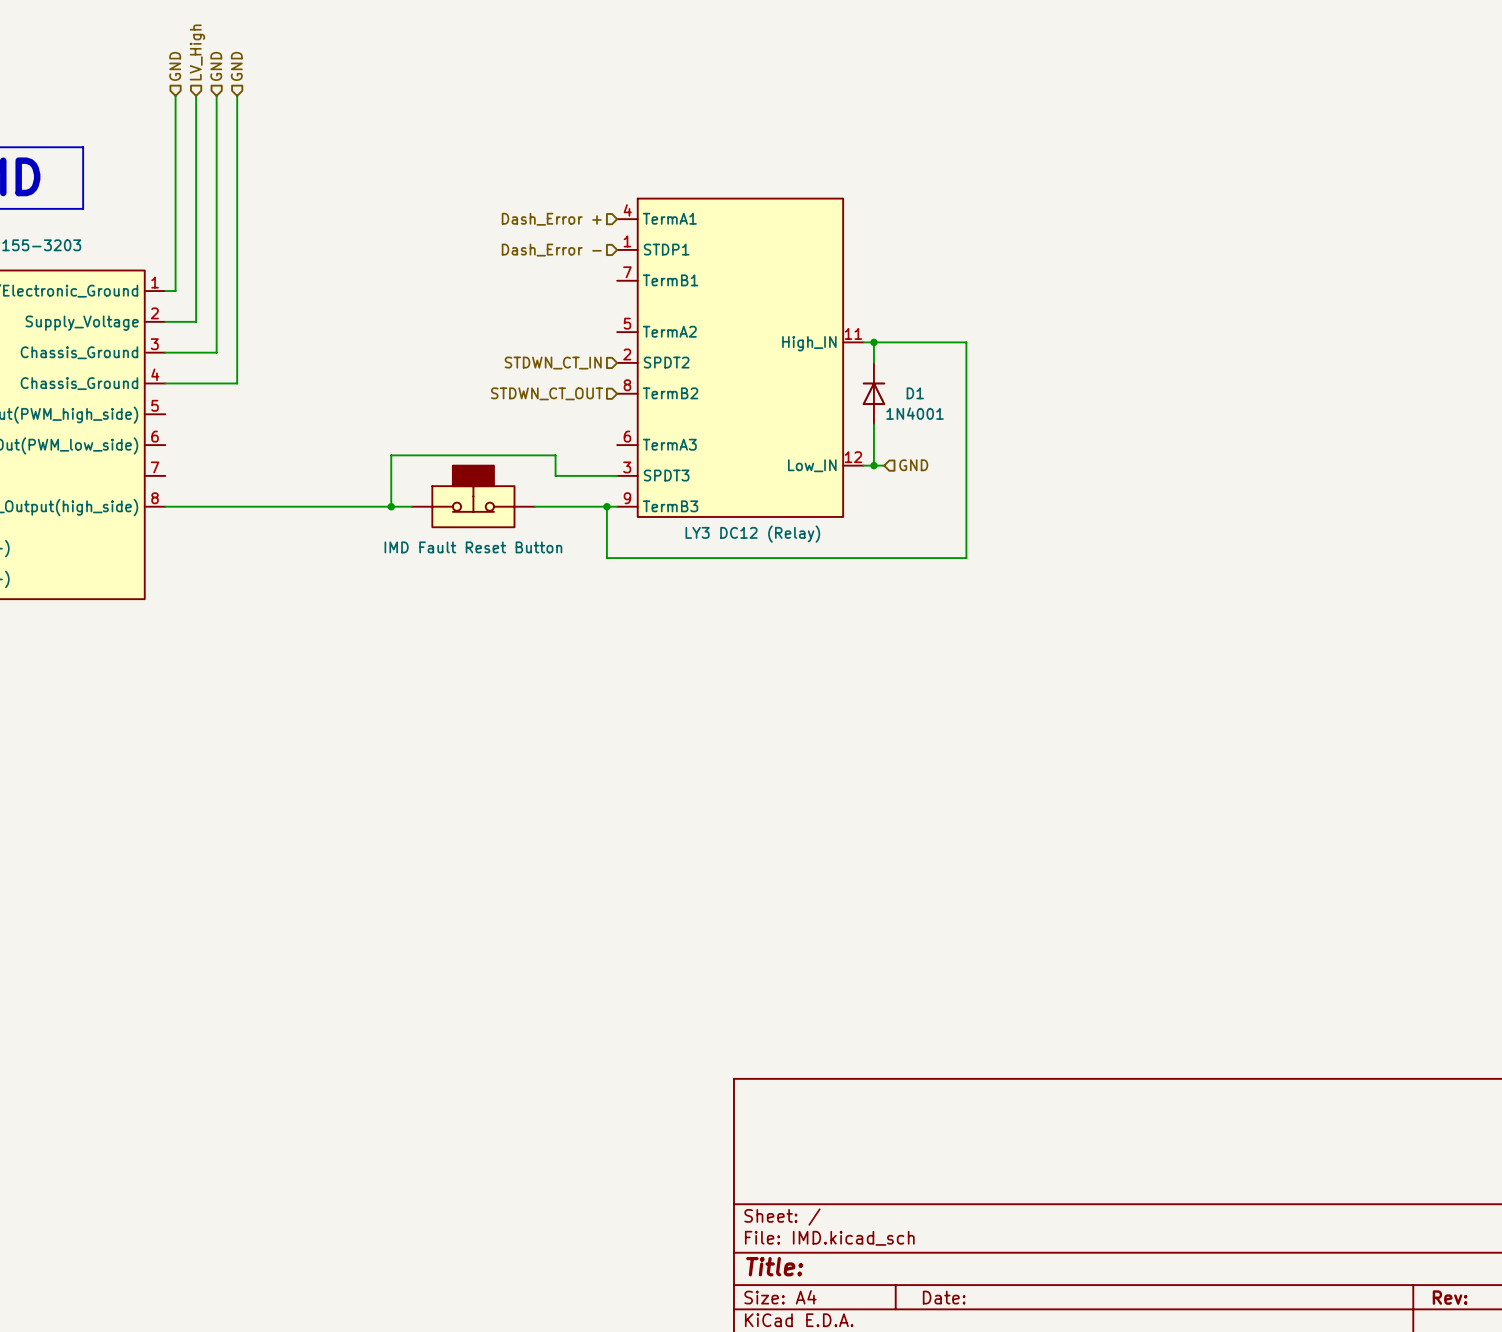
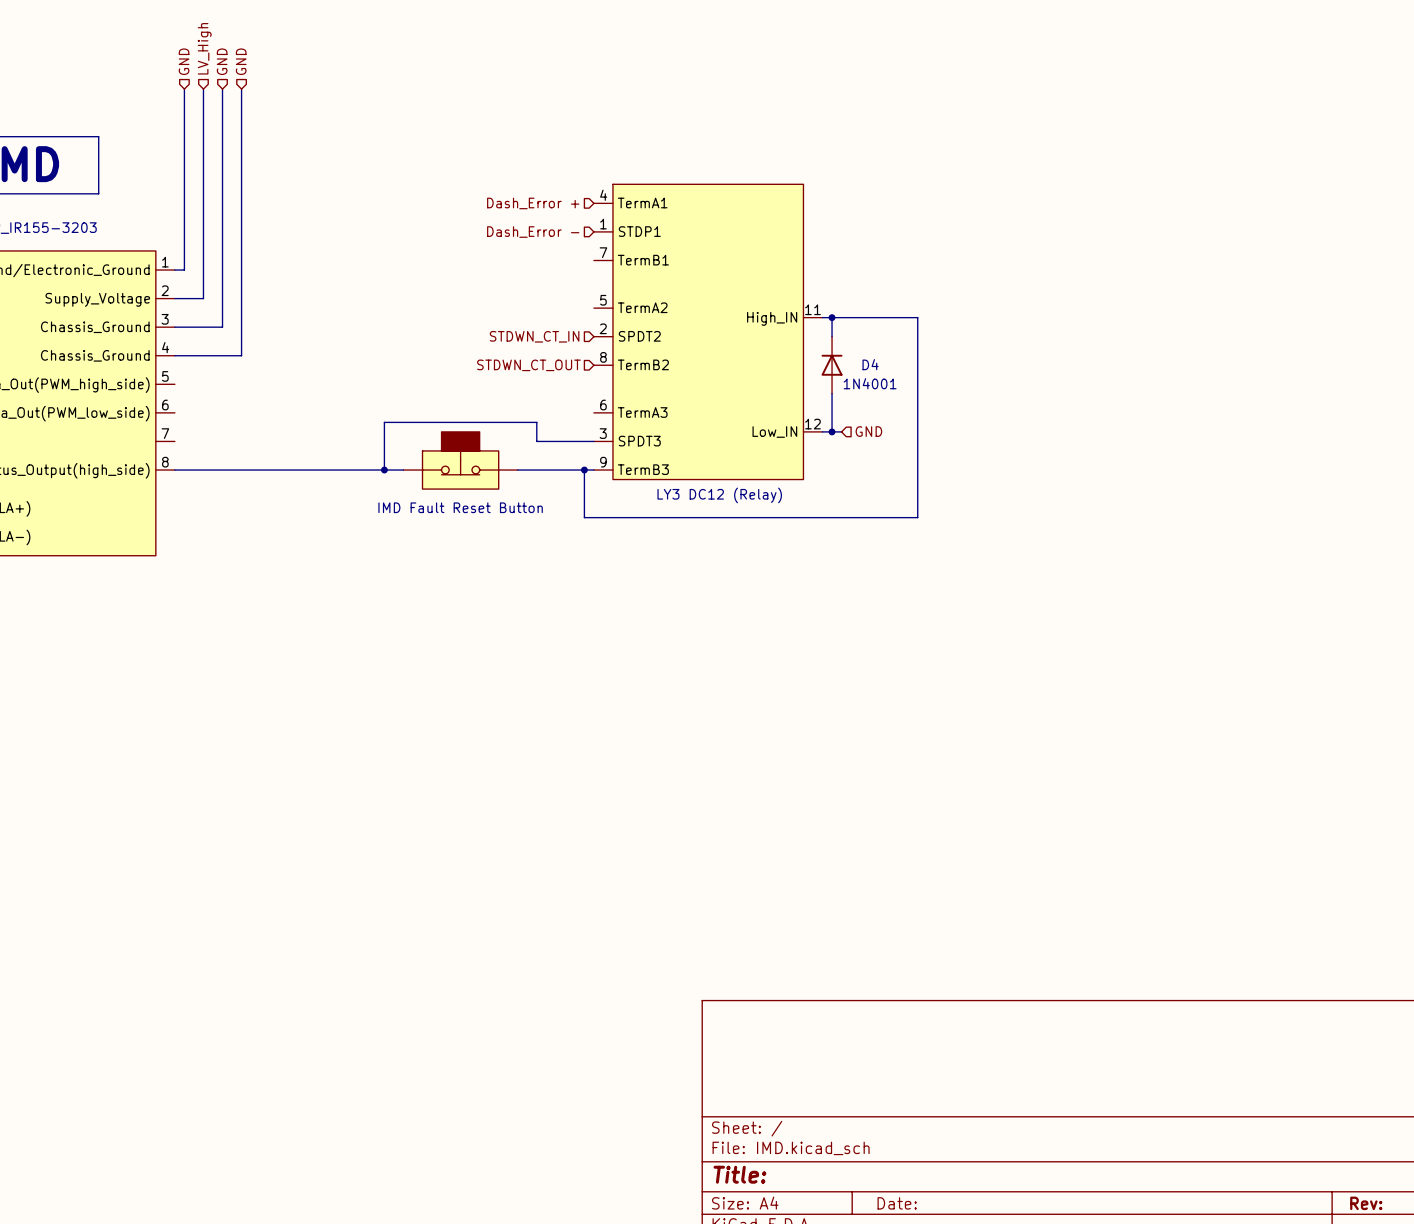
D1 name: D1 (915, 393) -> D4 (870, 364)

